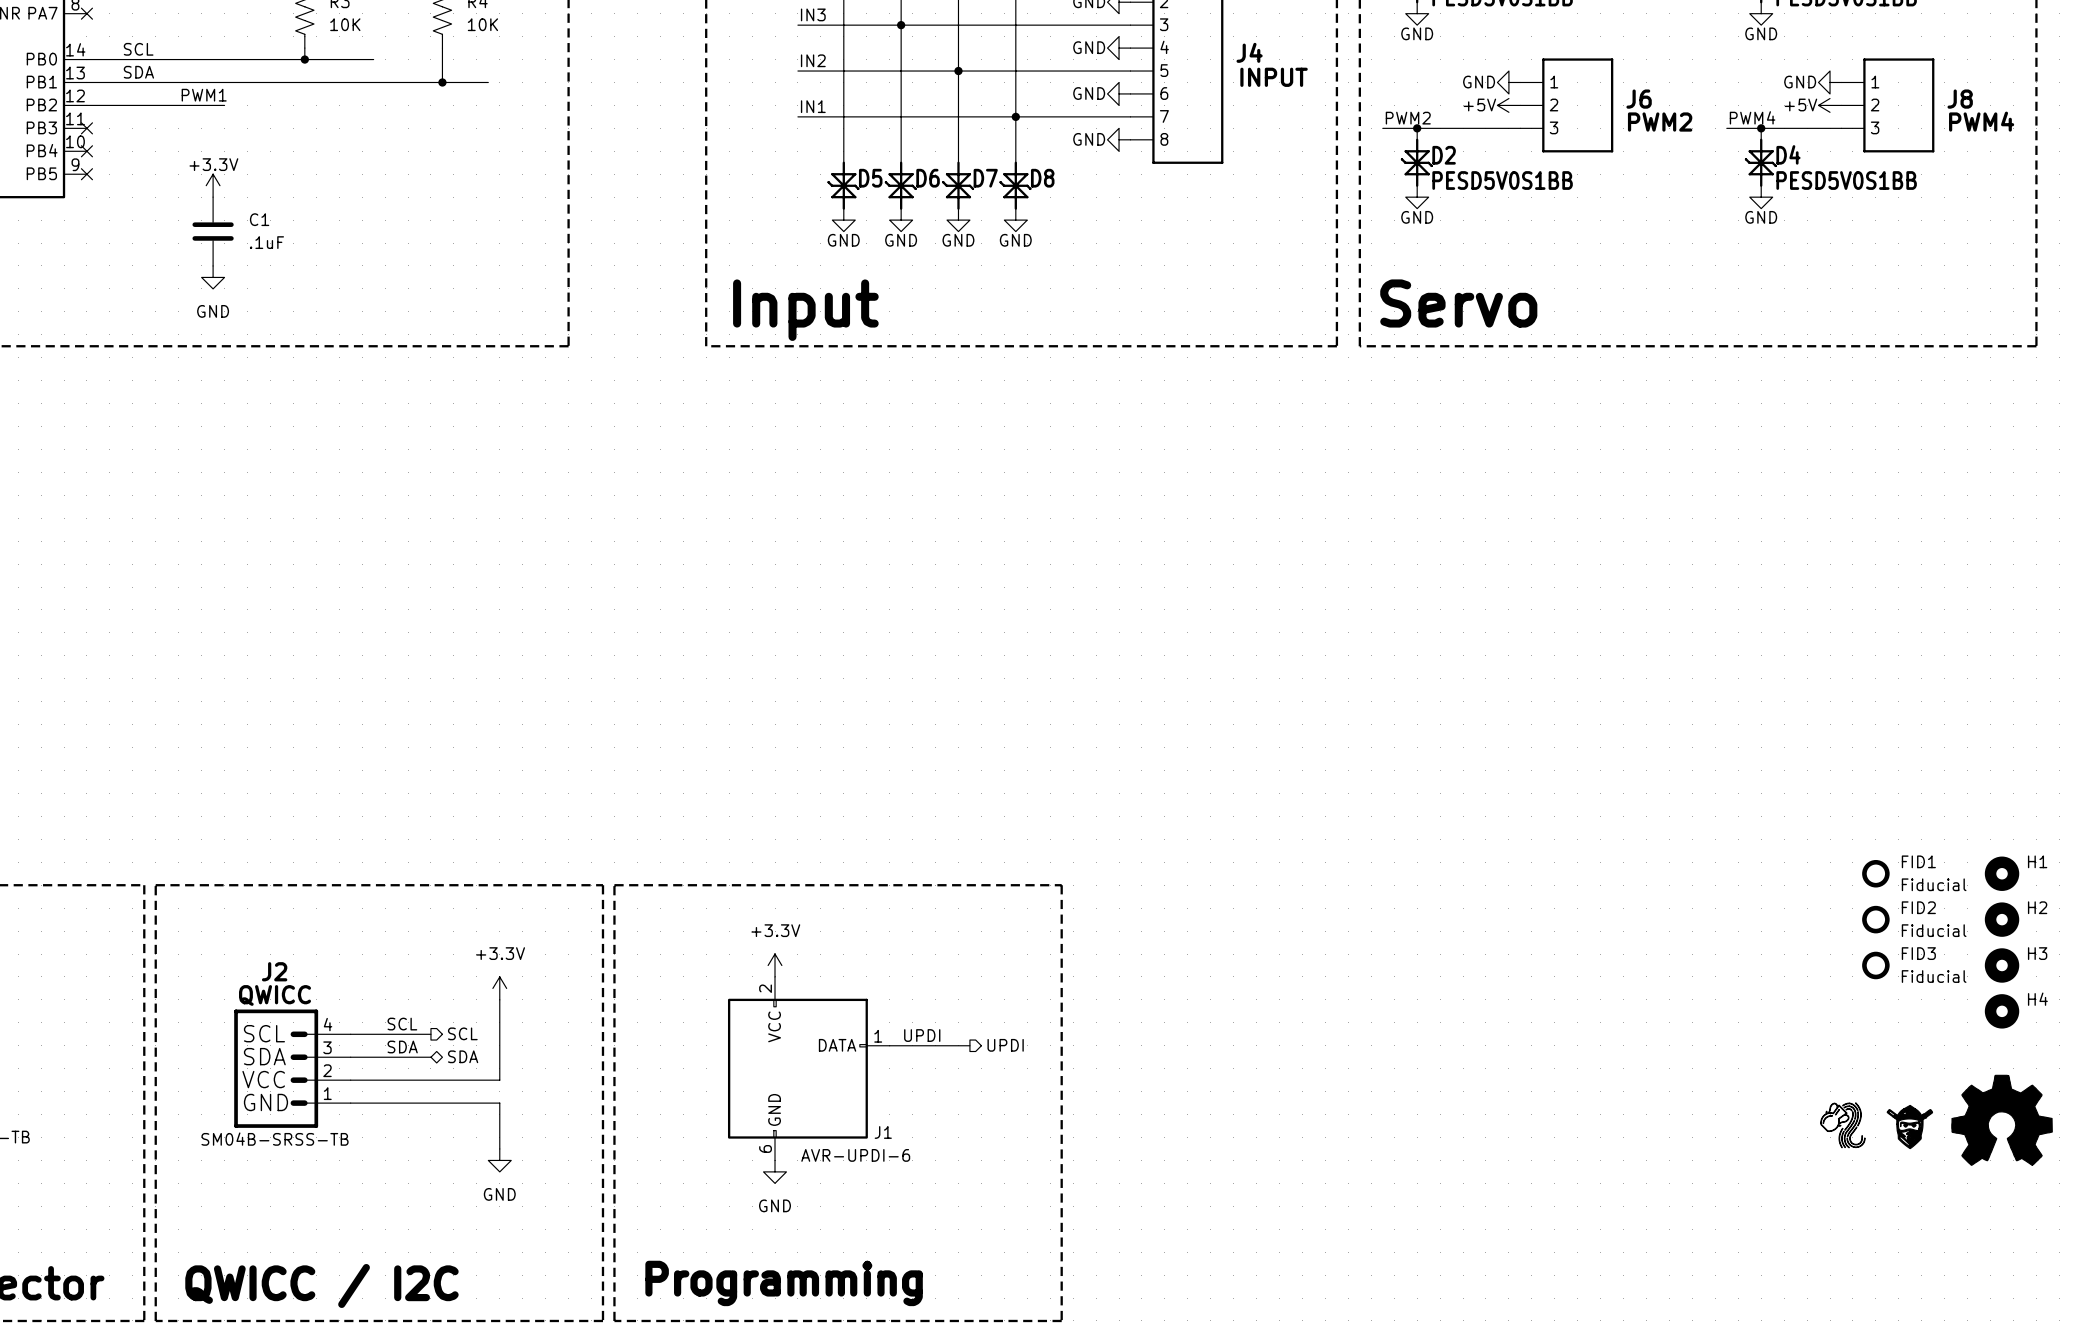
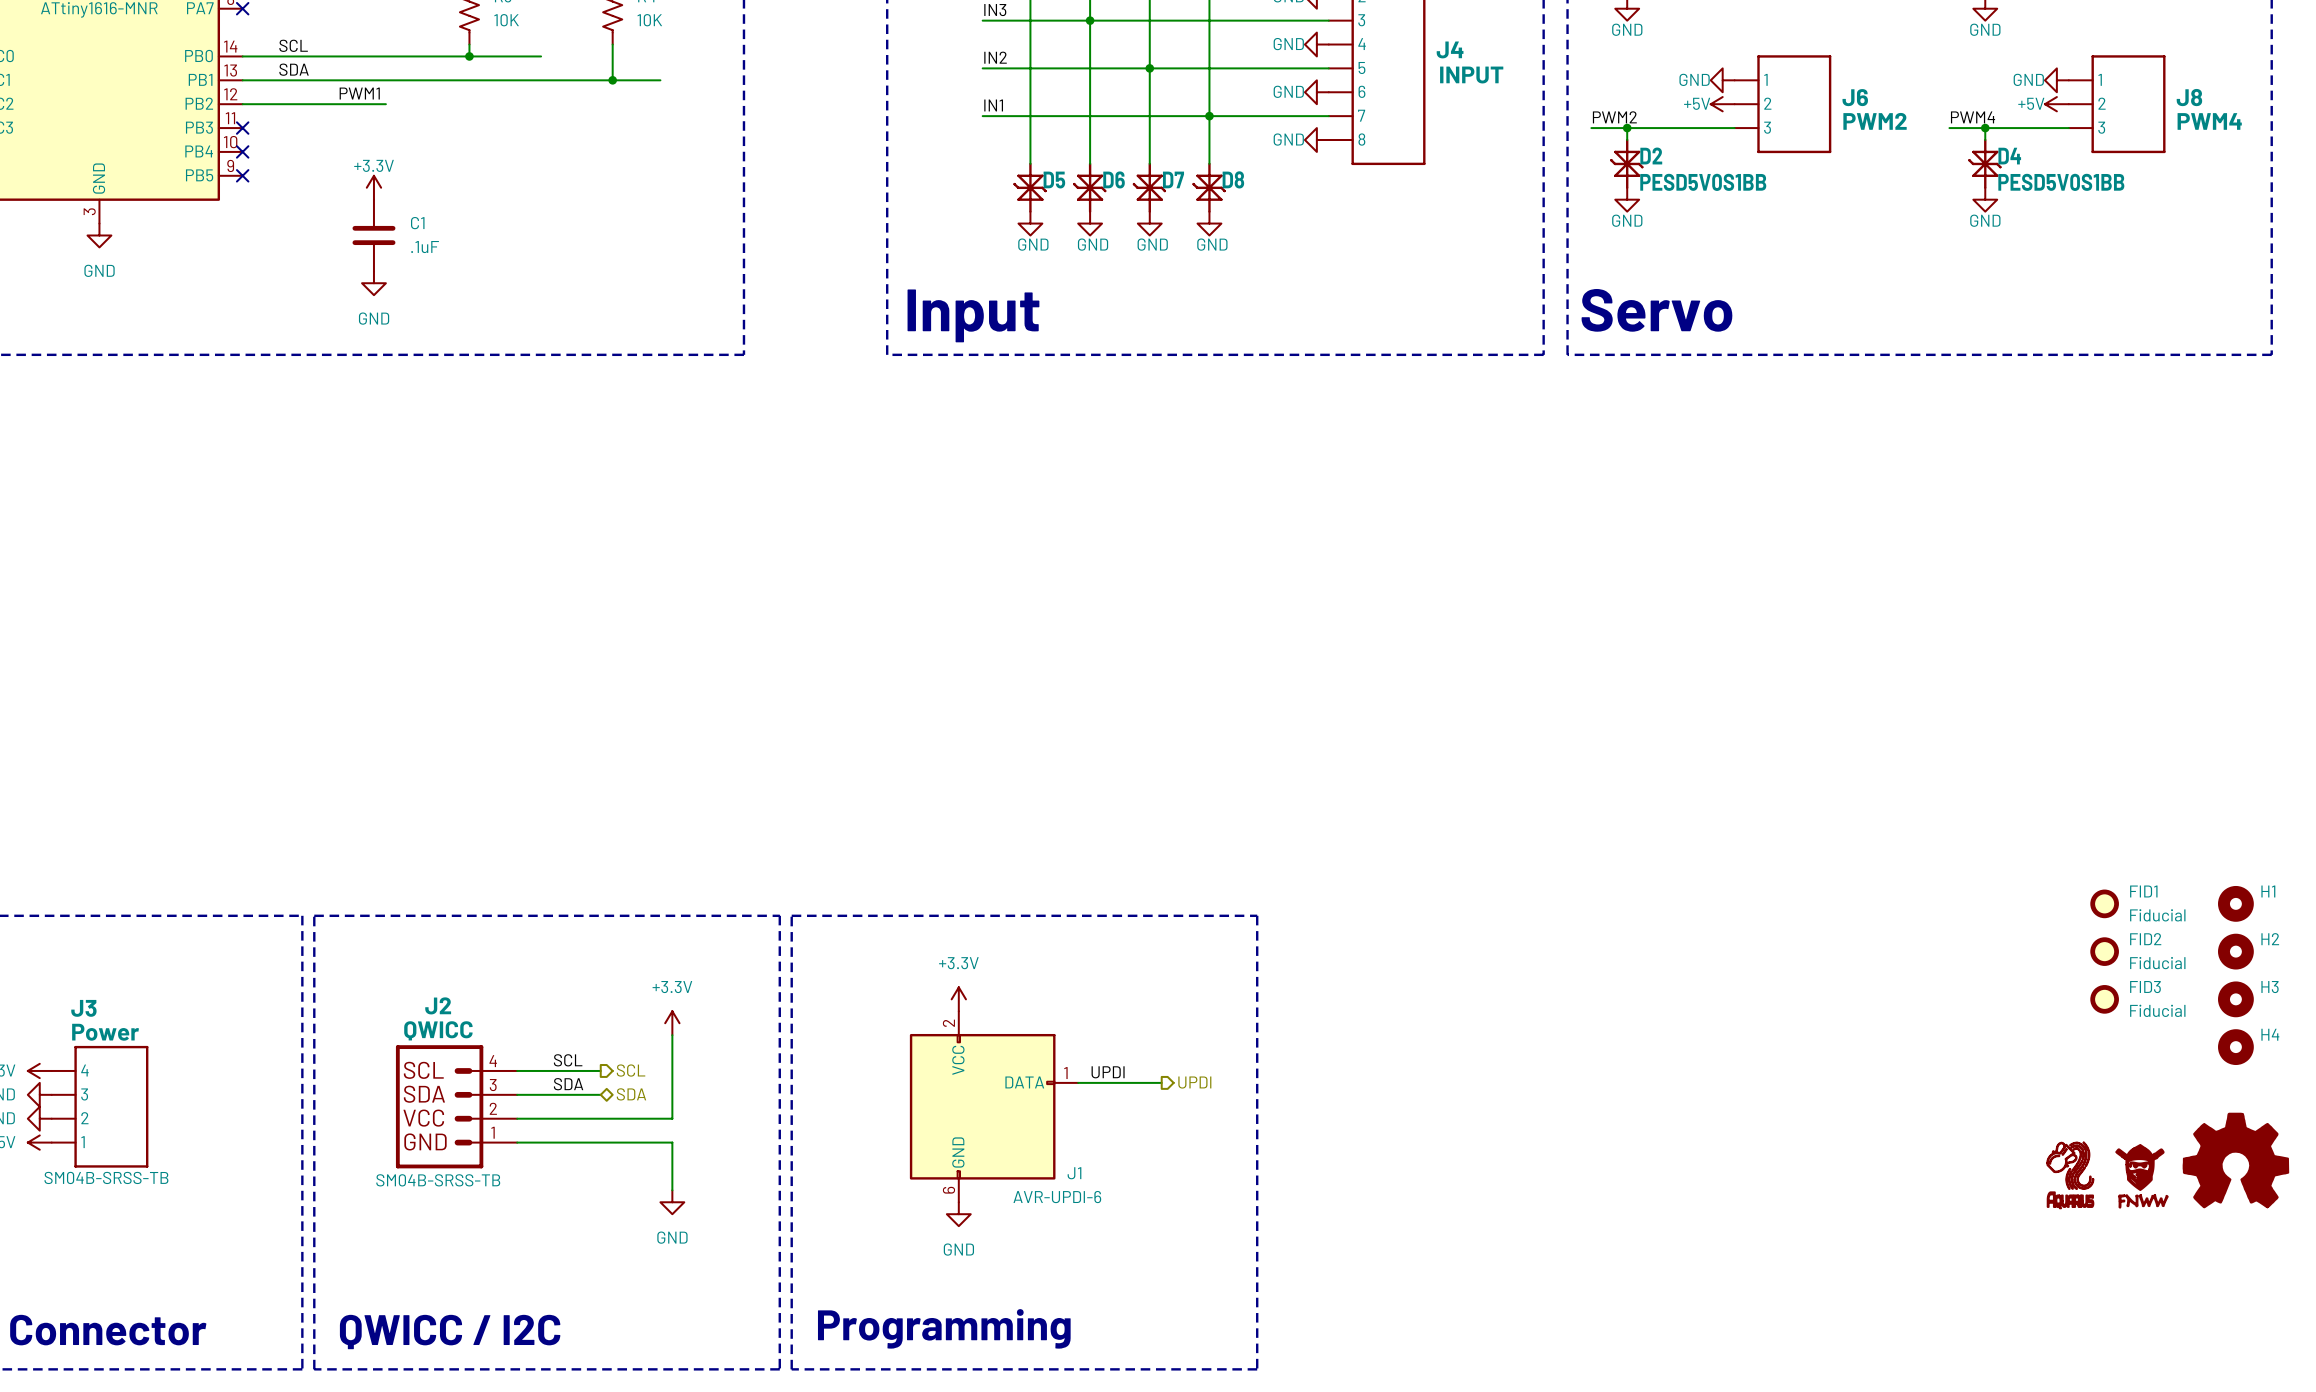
part: none -> (2070, 1200)
part: none -> (2143, 1201)

